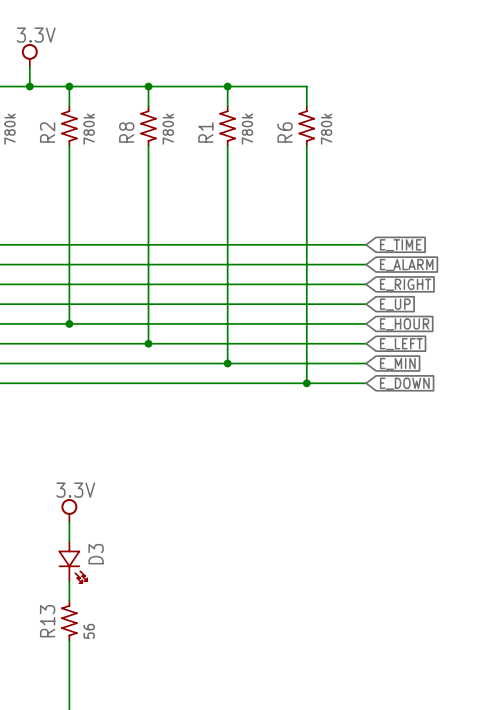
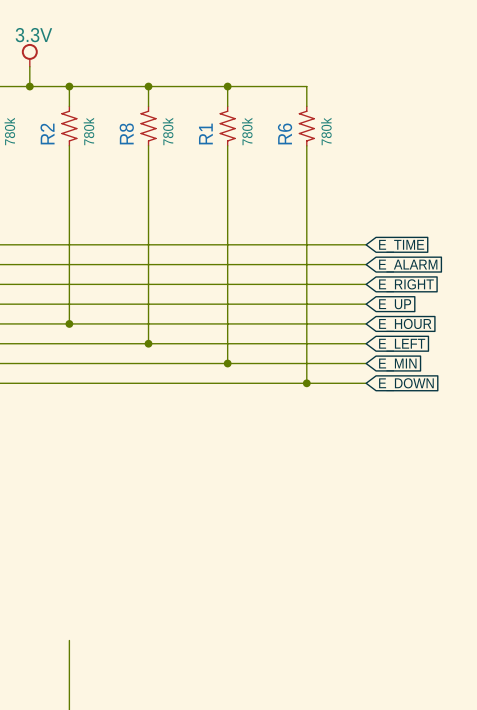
power symbol: 3.3V (69, 510) -> none
wire: (69, 521) (69, 541) -> none
D3: (73, 562) -> none
wire: (69, 581) (69, 600) -> none
R13: 56 (69, 620) -> none

